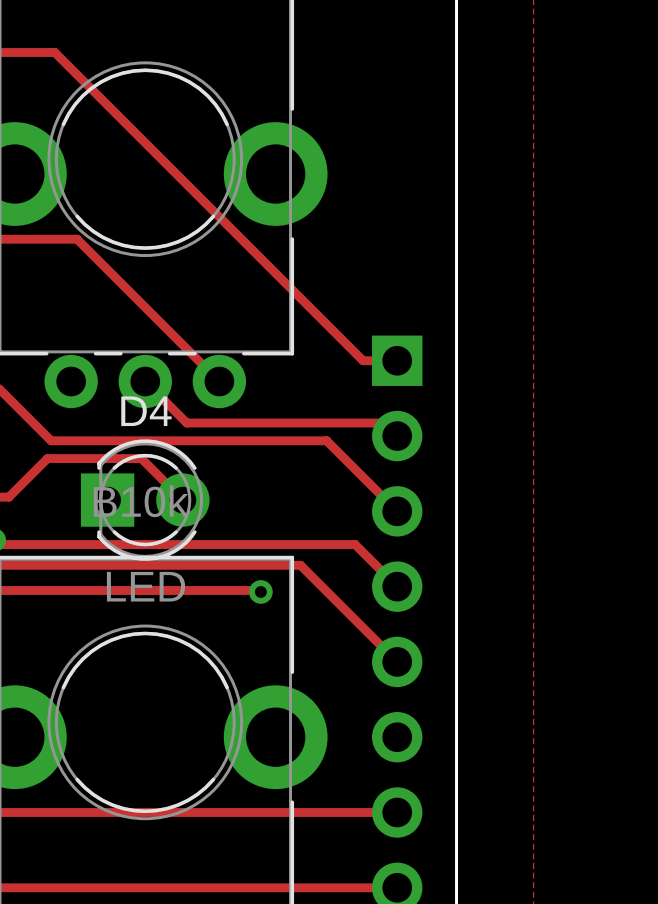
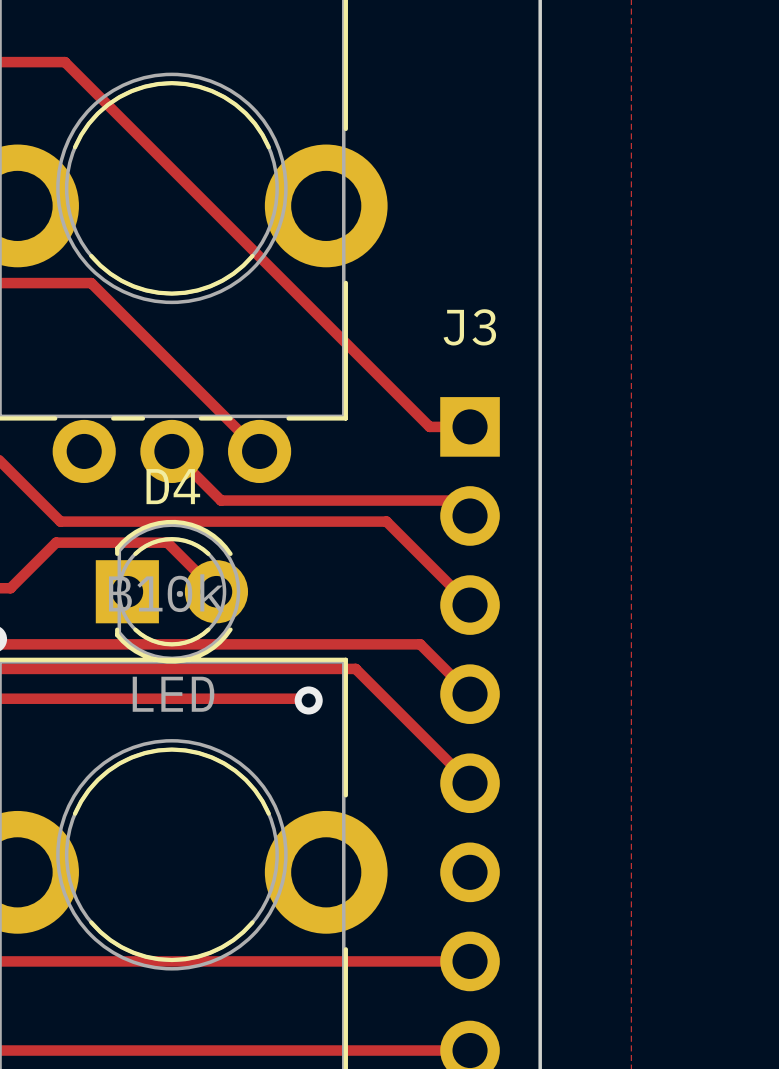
text: none -> J3 (469, 327)

